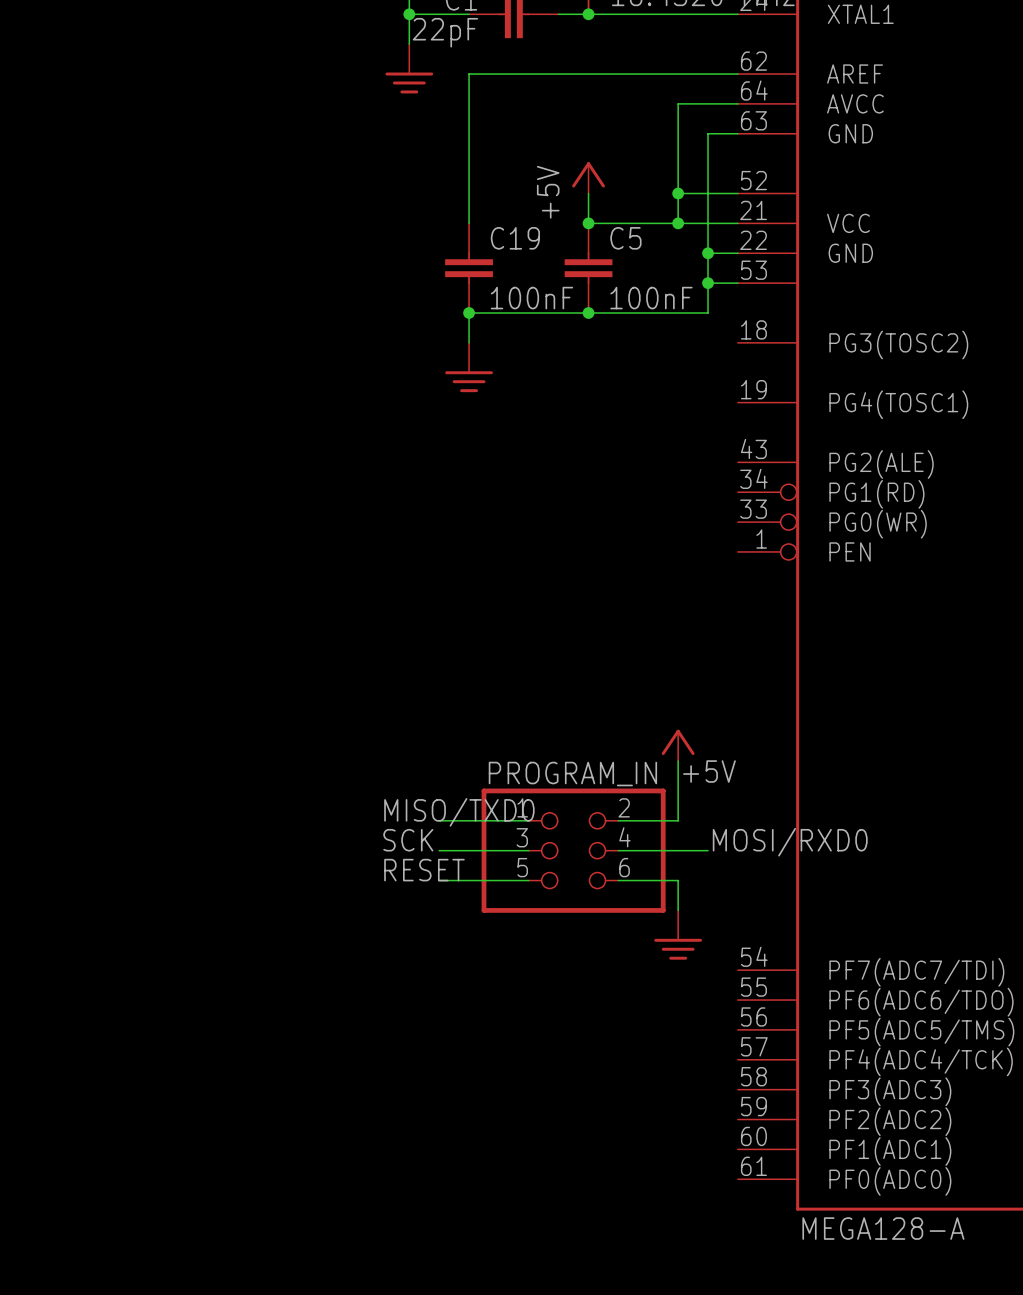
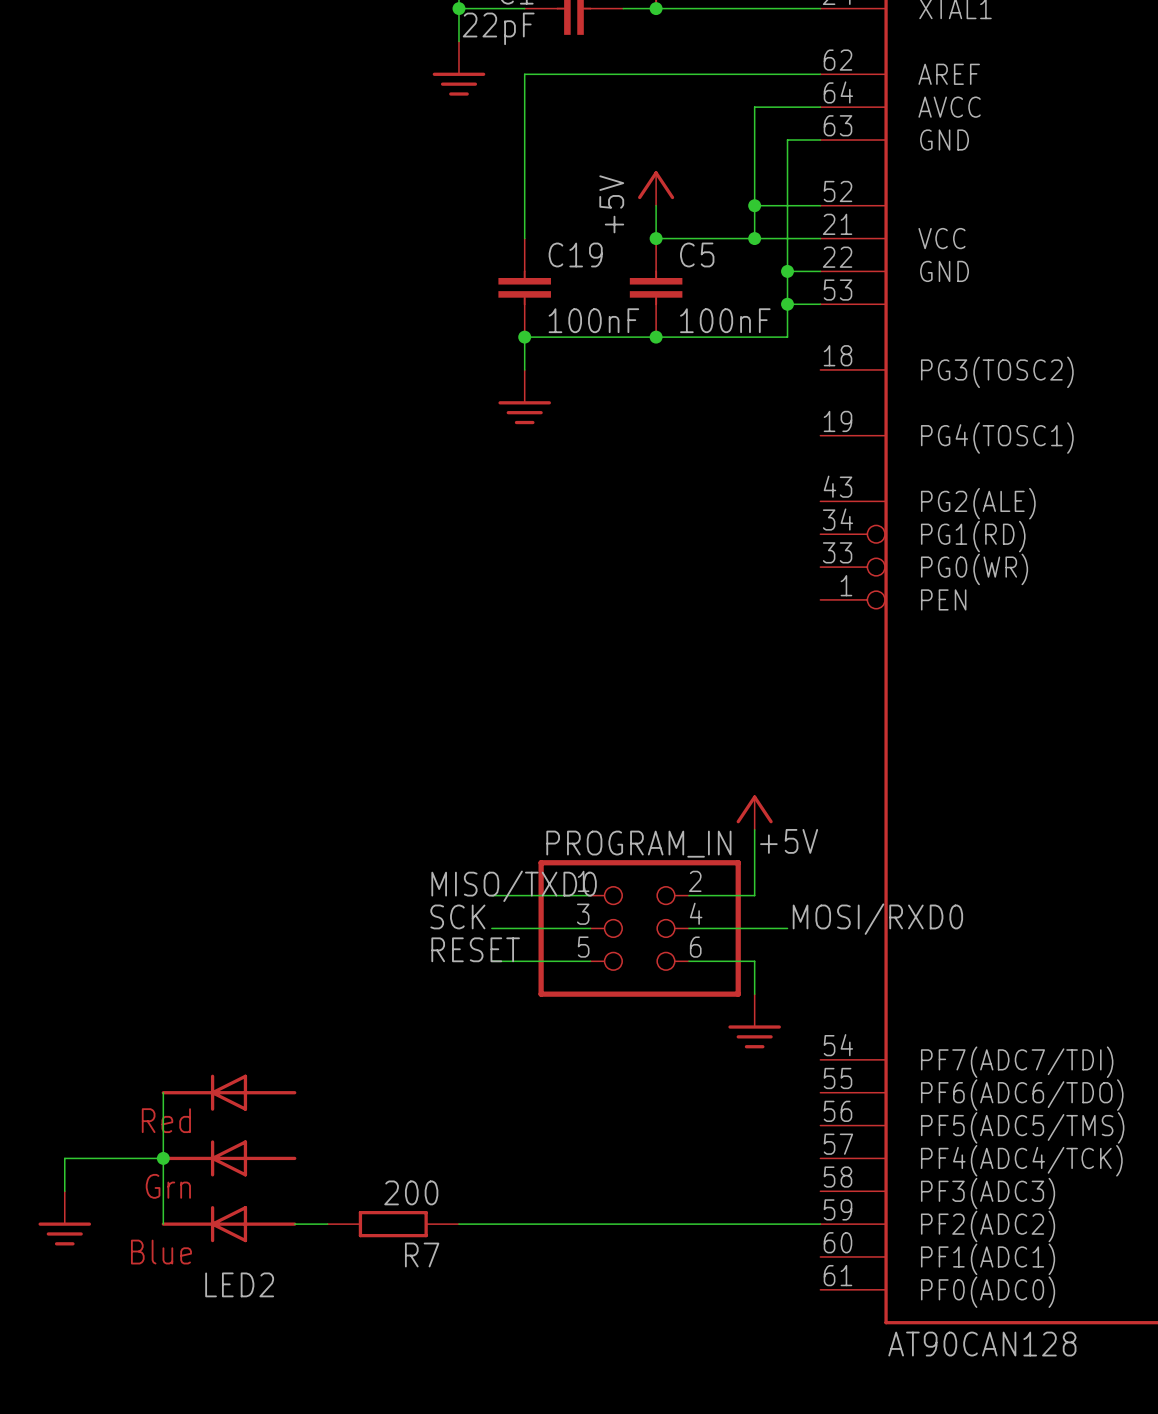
wire: none -> (163, 1092) (163, 1224)
wire: none -> (163, 1158) (64, 1158) (64, 1191)
junction: none -> (163, 1158)
LED2: none -> (229, 1158)
power symbol: none -> (64, 1218)
wire: none -> (294, 1224) (327, 1224)
R7: none -> 200 (393, 1224)
wire: none -> (458, 1224) (820, 1224)
part value: MEGA128-A (883, 1228) -> AT90CAN128 (982, 1344)

